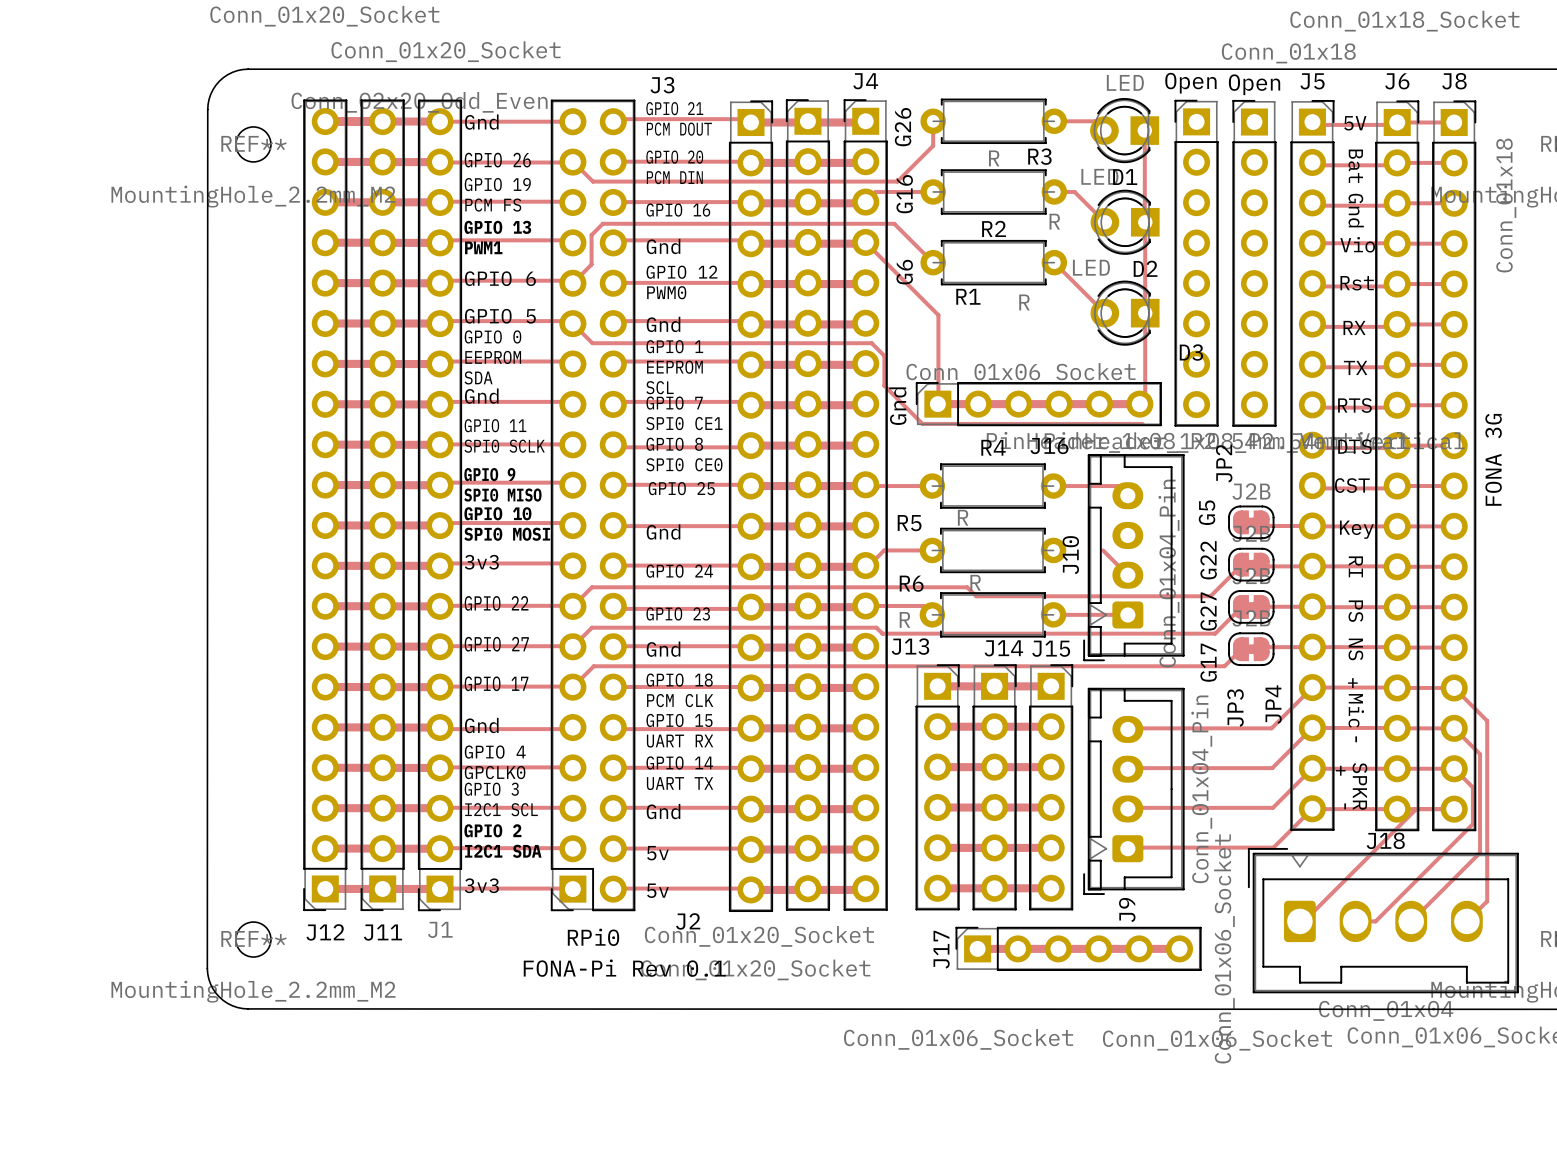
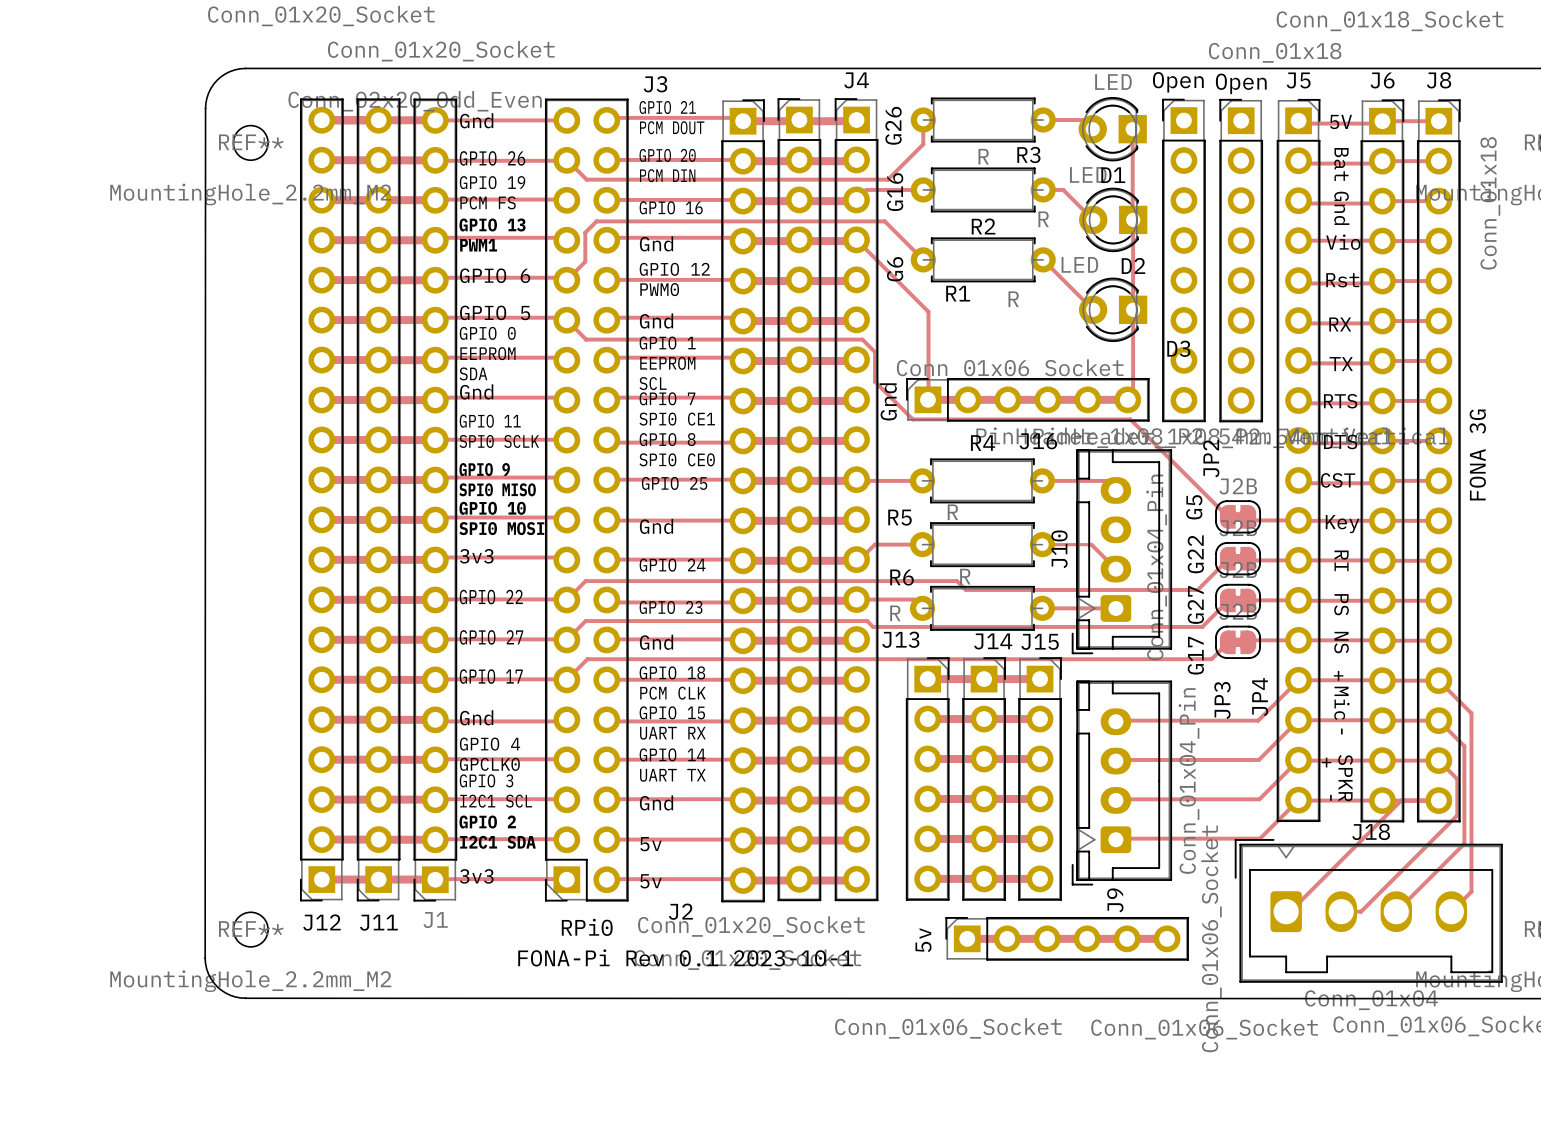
track: none -> (1130, 419) (1227, 516)
track: none -> (1042, 544) (1091, 544)
J17 name: J17 (941, 949) -> none
text: none -> 5v (923, 940)
text: FONA-Pi Rev 0.1 (624, 968) -> FONA-Pi Rev 0.1 2023-10-1 (685, 957)

